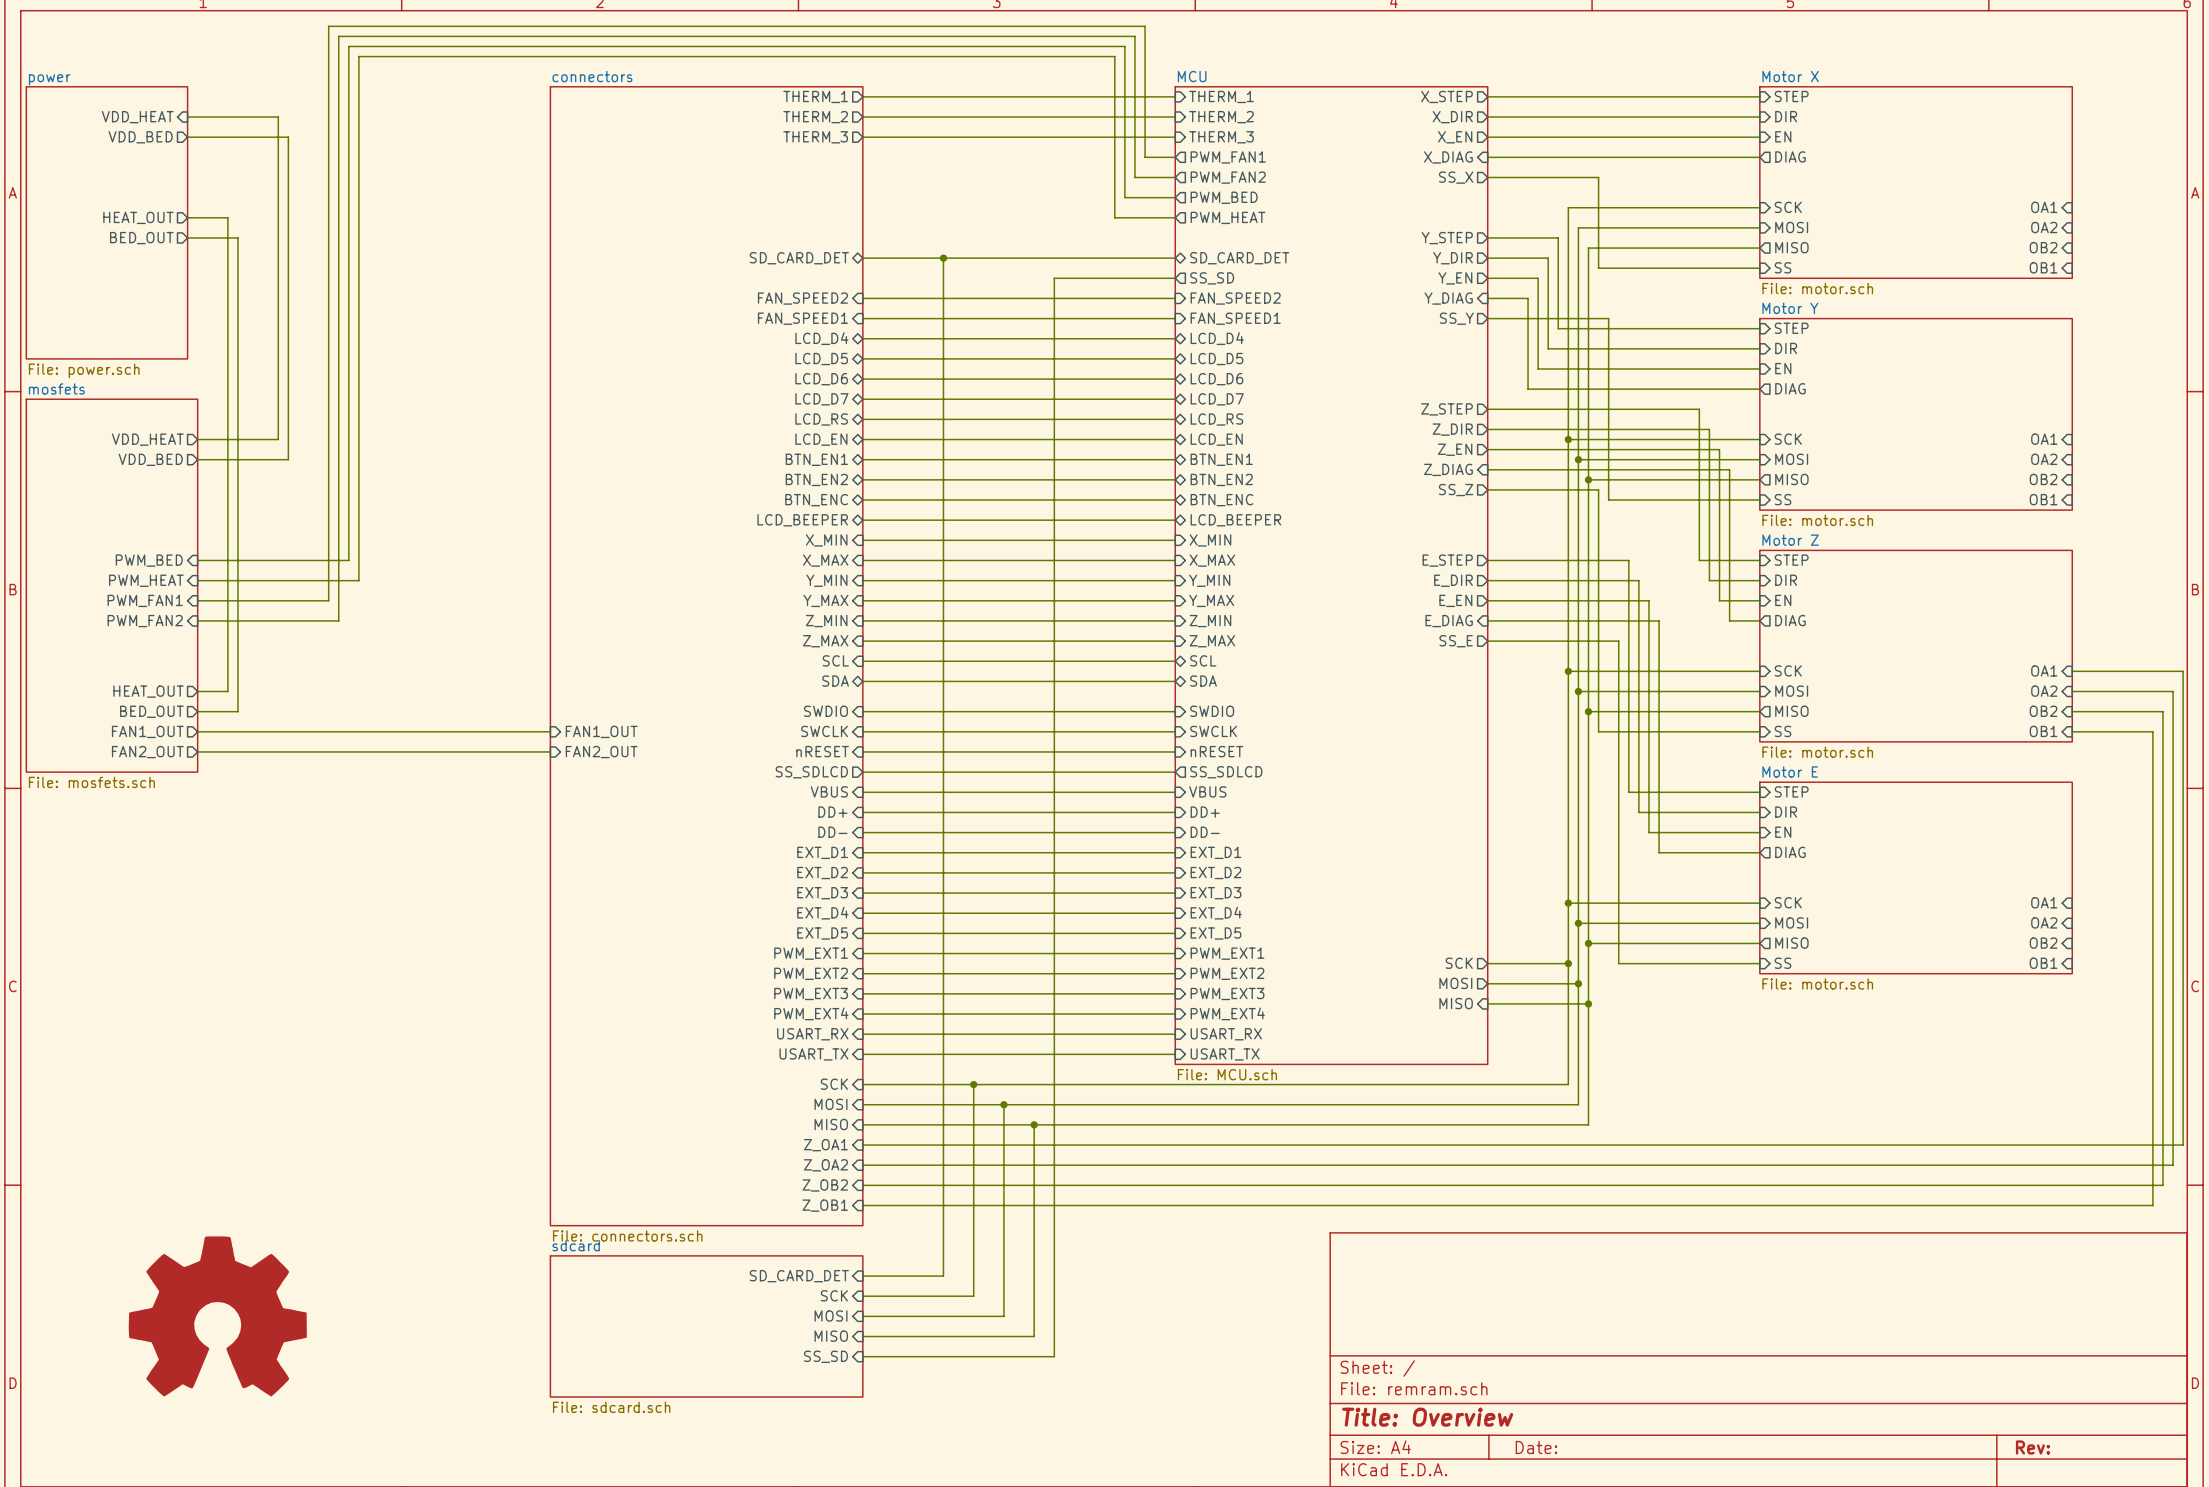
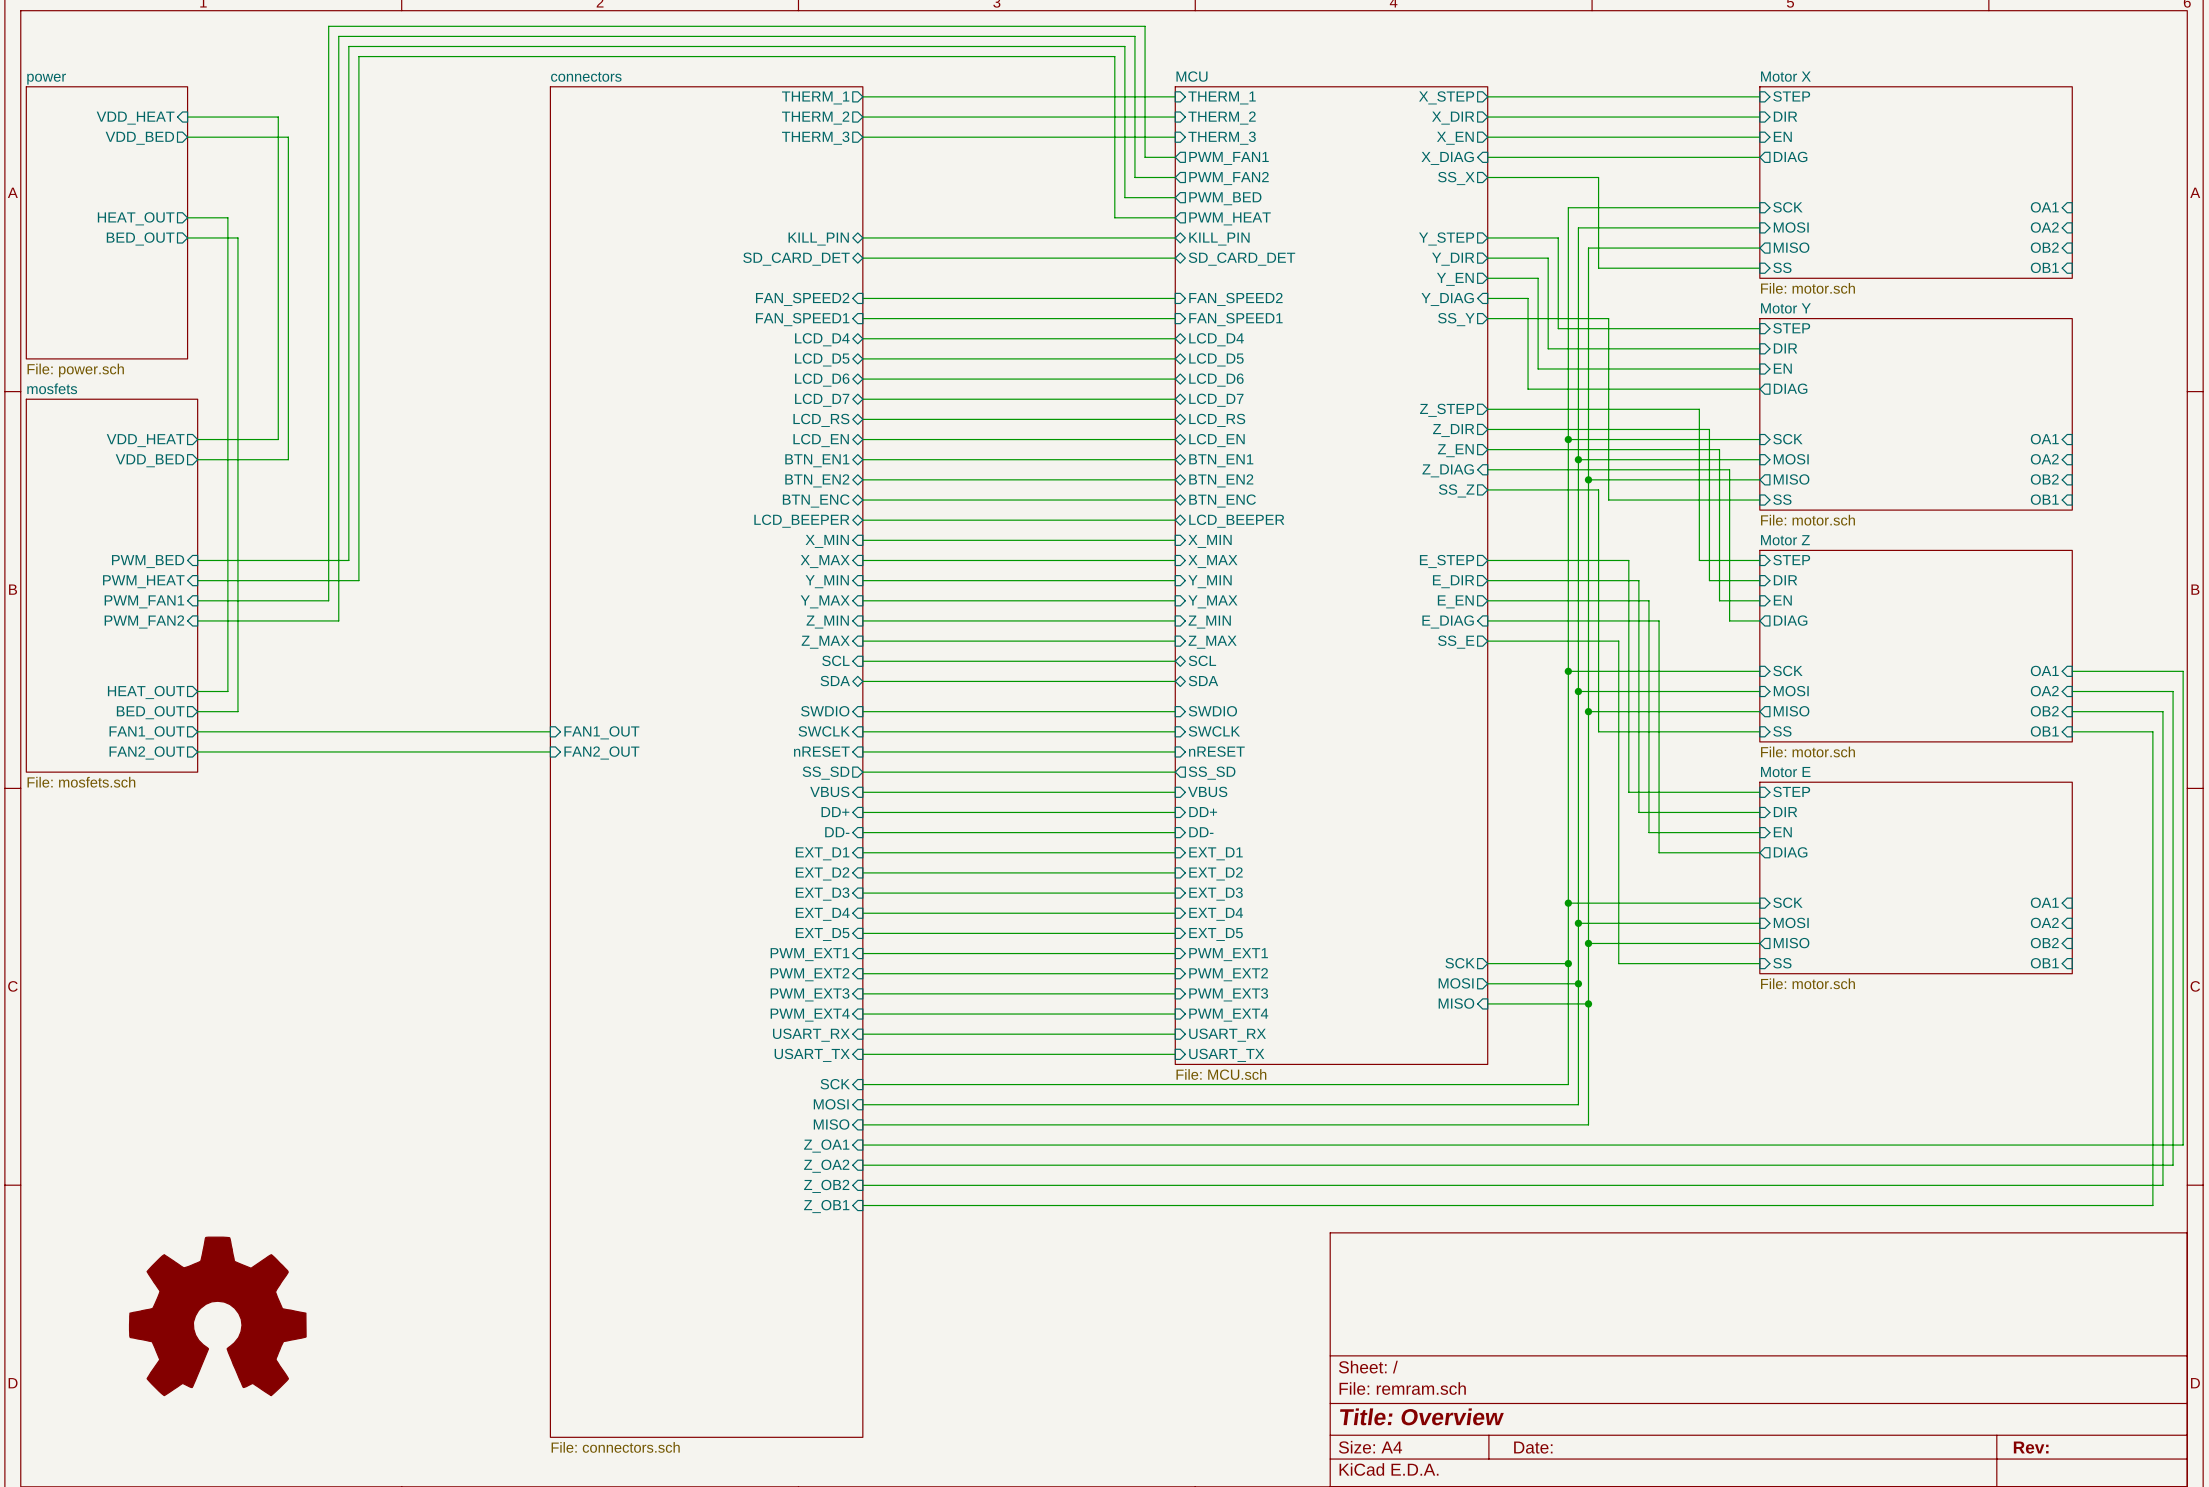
wire: none -> (862, 237) (1175, 237)
sheet pin: none -> KILL_PIN (818, 239)
sheet pin: none -> KILL_PIN (1219, 239)
wire: (943, 258) (943, 1276) (862, 1276) -> none
junction: (943, 258) -> none
wire: (1175, 278) (1054, 278) (1054, 1356) (862, 1356) -> none
sheet pin: SS_SD (1212, 278) -> none
sheet connectors: File: connectors.sch (706, 656) -> none
sheet connectors: none -> File: connectors.sch (706, 762)
sheet pin: SS_SDLCD (811, 772) -> SS_SD (826, 773)
sheet pin: SS_SDLCD (1226, 772) -> SS_SD (1212, 773)
wire: (973, 1084) (973, 1296) (862, 1296) -> none
junction: (973, 1084) -> none
wire: (1003, 1104) (1003, 1316) (862, 1316) -> none
junction: (1003, 1104) -> none
wire: (1034, 1124) (1034, 1336) (862, 1336) -> none
junction: (1034, 1124) -> none
sheet pin: SD_CARD_DET (799, 1276) -> none
sheet pin: SCK (834, 1295) -> none
sheet pin: MOSI (831, 1316) -> none
sheet sdcard: File: sdcard.sch (706, 1326) -> none
sheet pin: MISO (831, 1336) -> none
sheet pin: SS_SD (825, 1356) -> none

